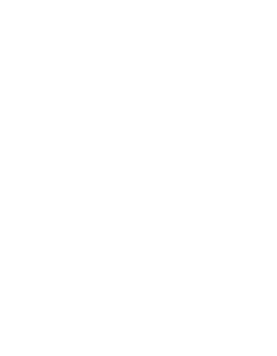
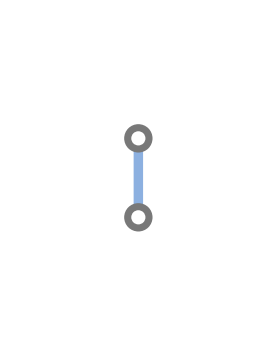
track: none -> (138, 138) (138, 217)
via: none -> (138, 138)
via: none -> (138, 217)

